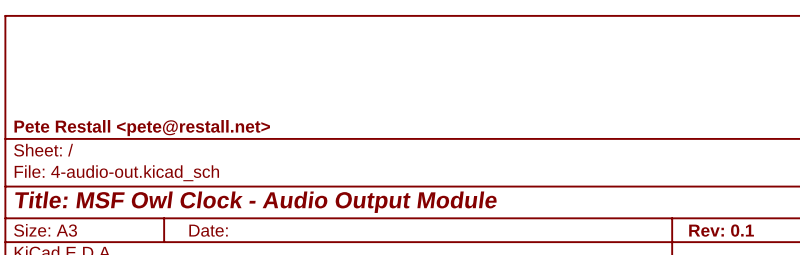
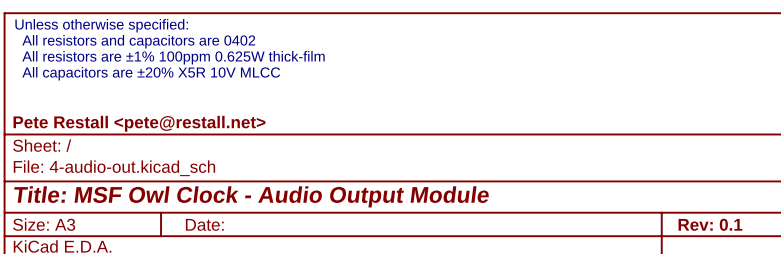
text: none -> Unless otherwise specified: (101, 25)
text: none -> All resistors and capacitors are 0402 (138, 41)
text: none -> All resistors are ±1% 100ppm 0.625W thick-film (173, 57)
text: none -> All capacitors are ±20% X5R 10V MLCC (151, 73)

